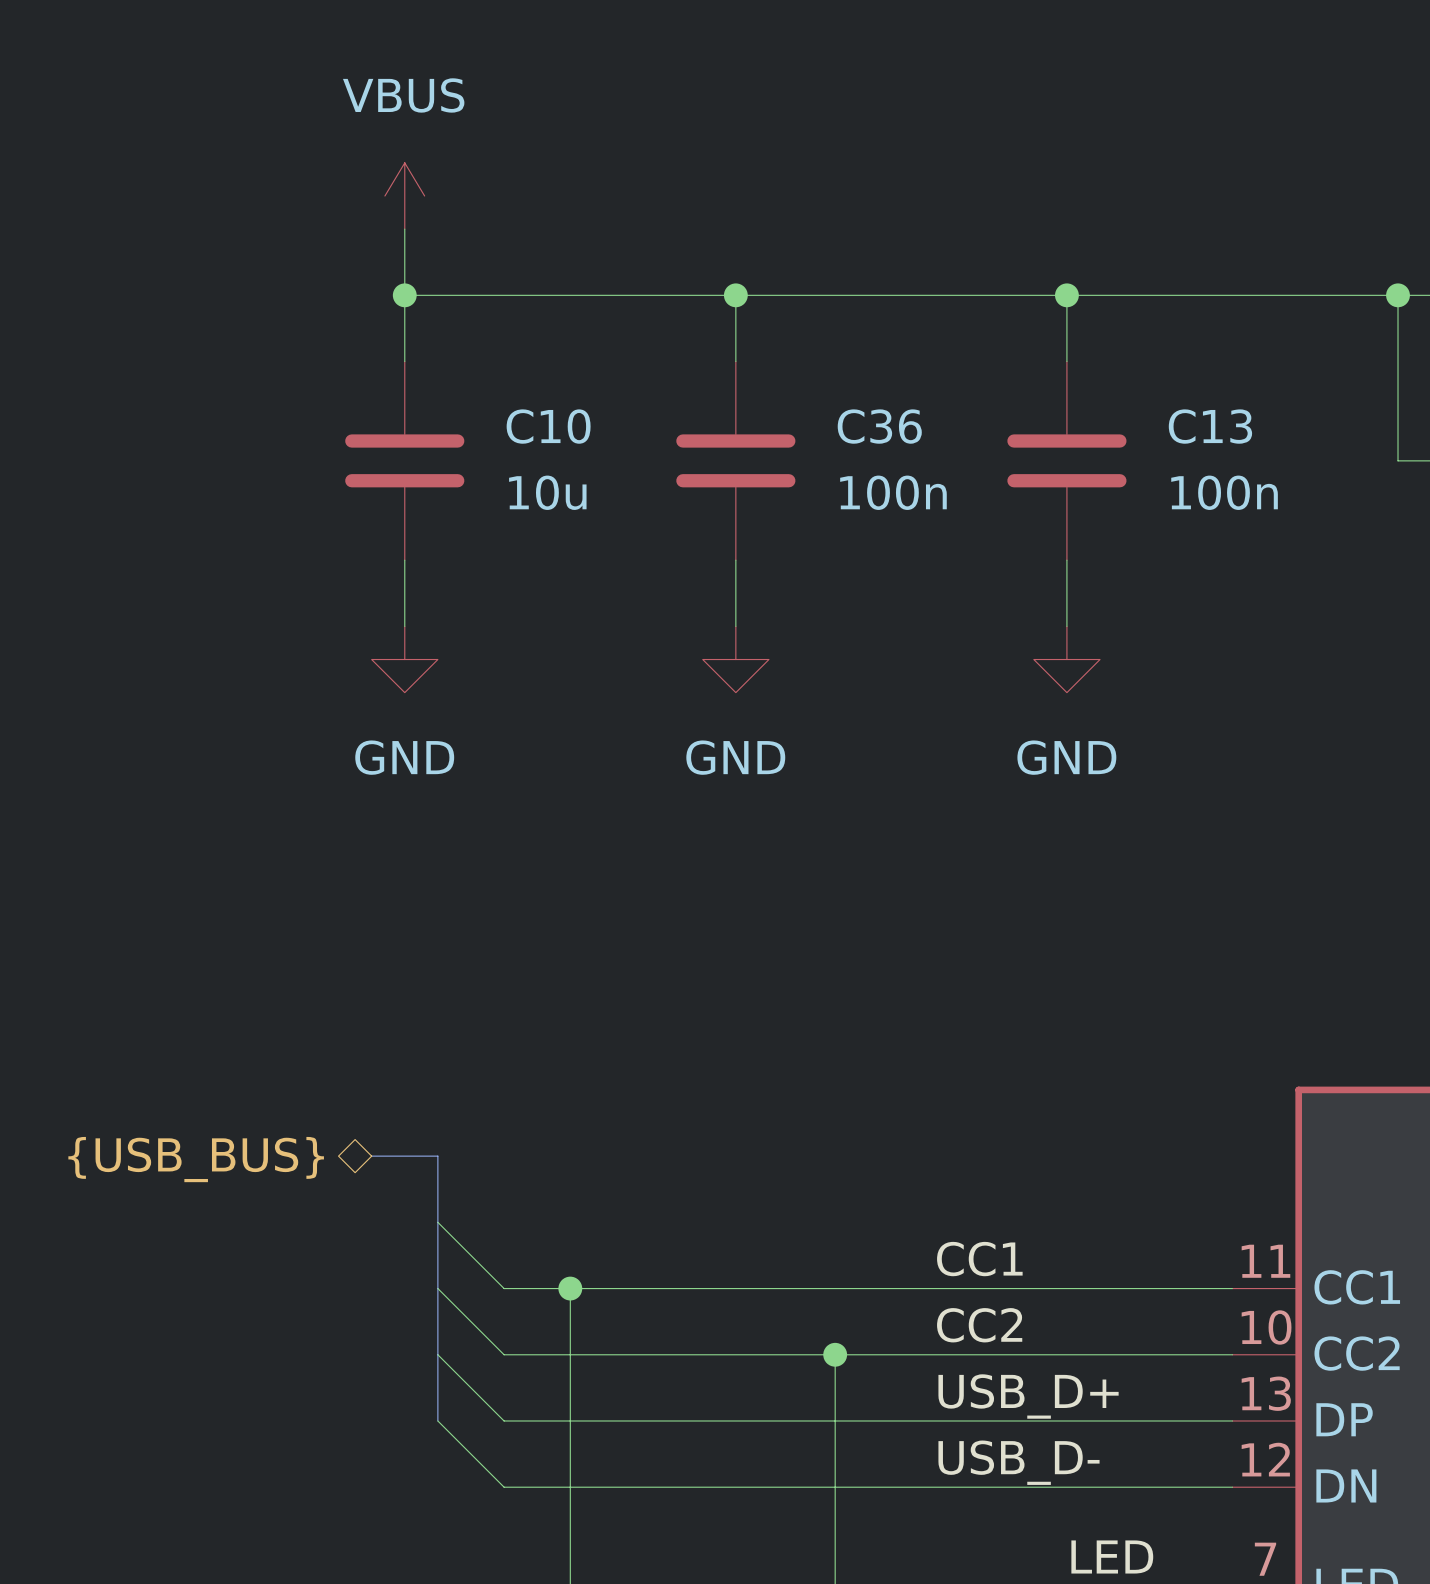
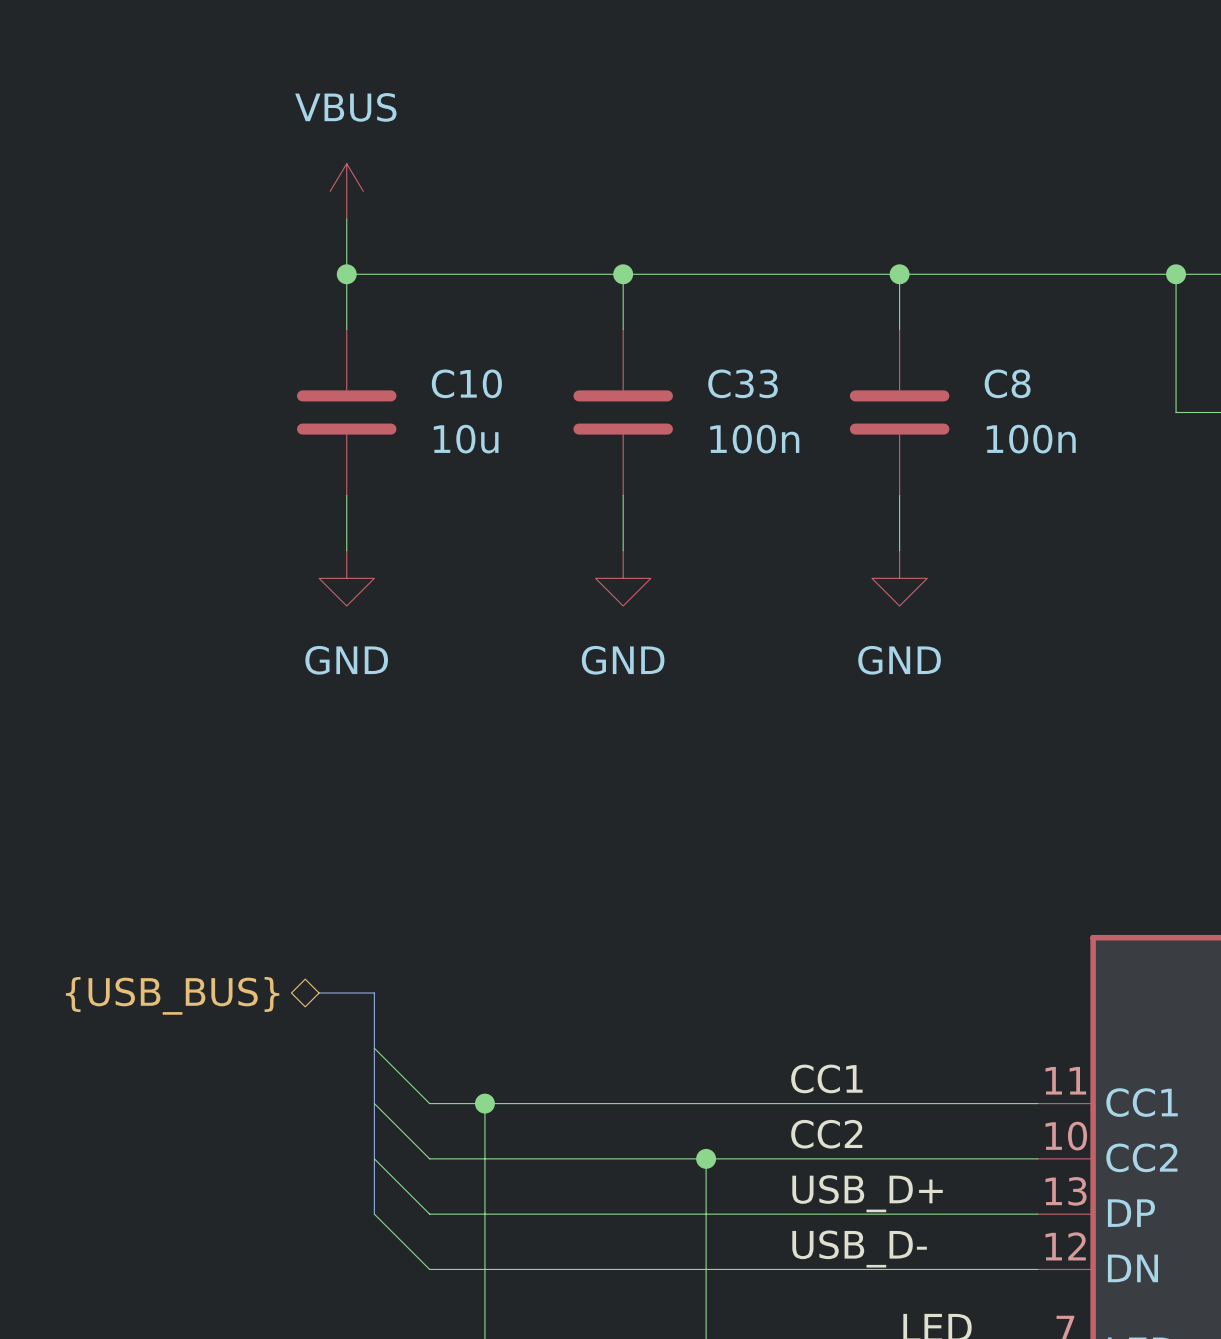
C36 name: C36 (879, 426) -> C33 (743, 383)
C13 name: C13 (1210, 426) -> C8 (1007, 383)

